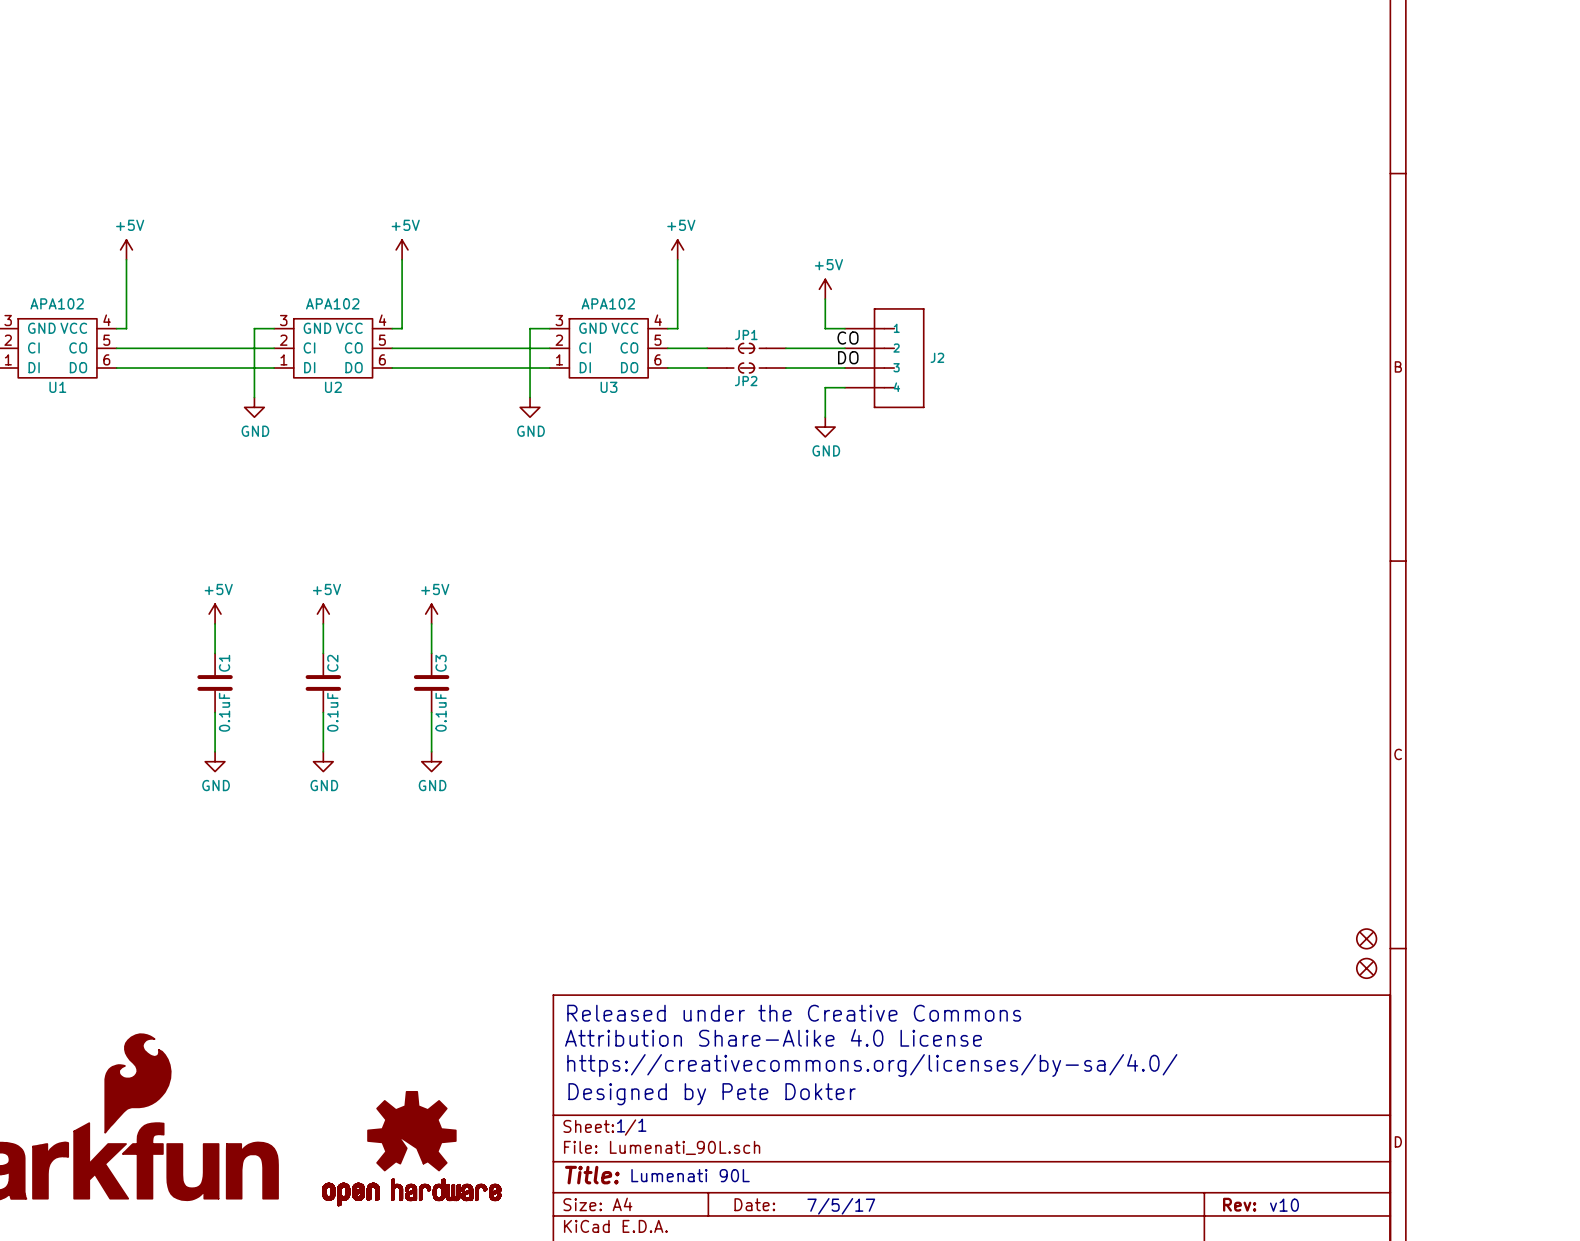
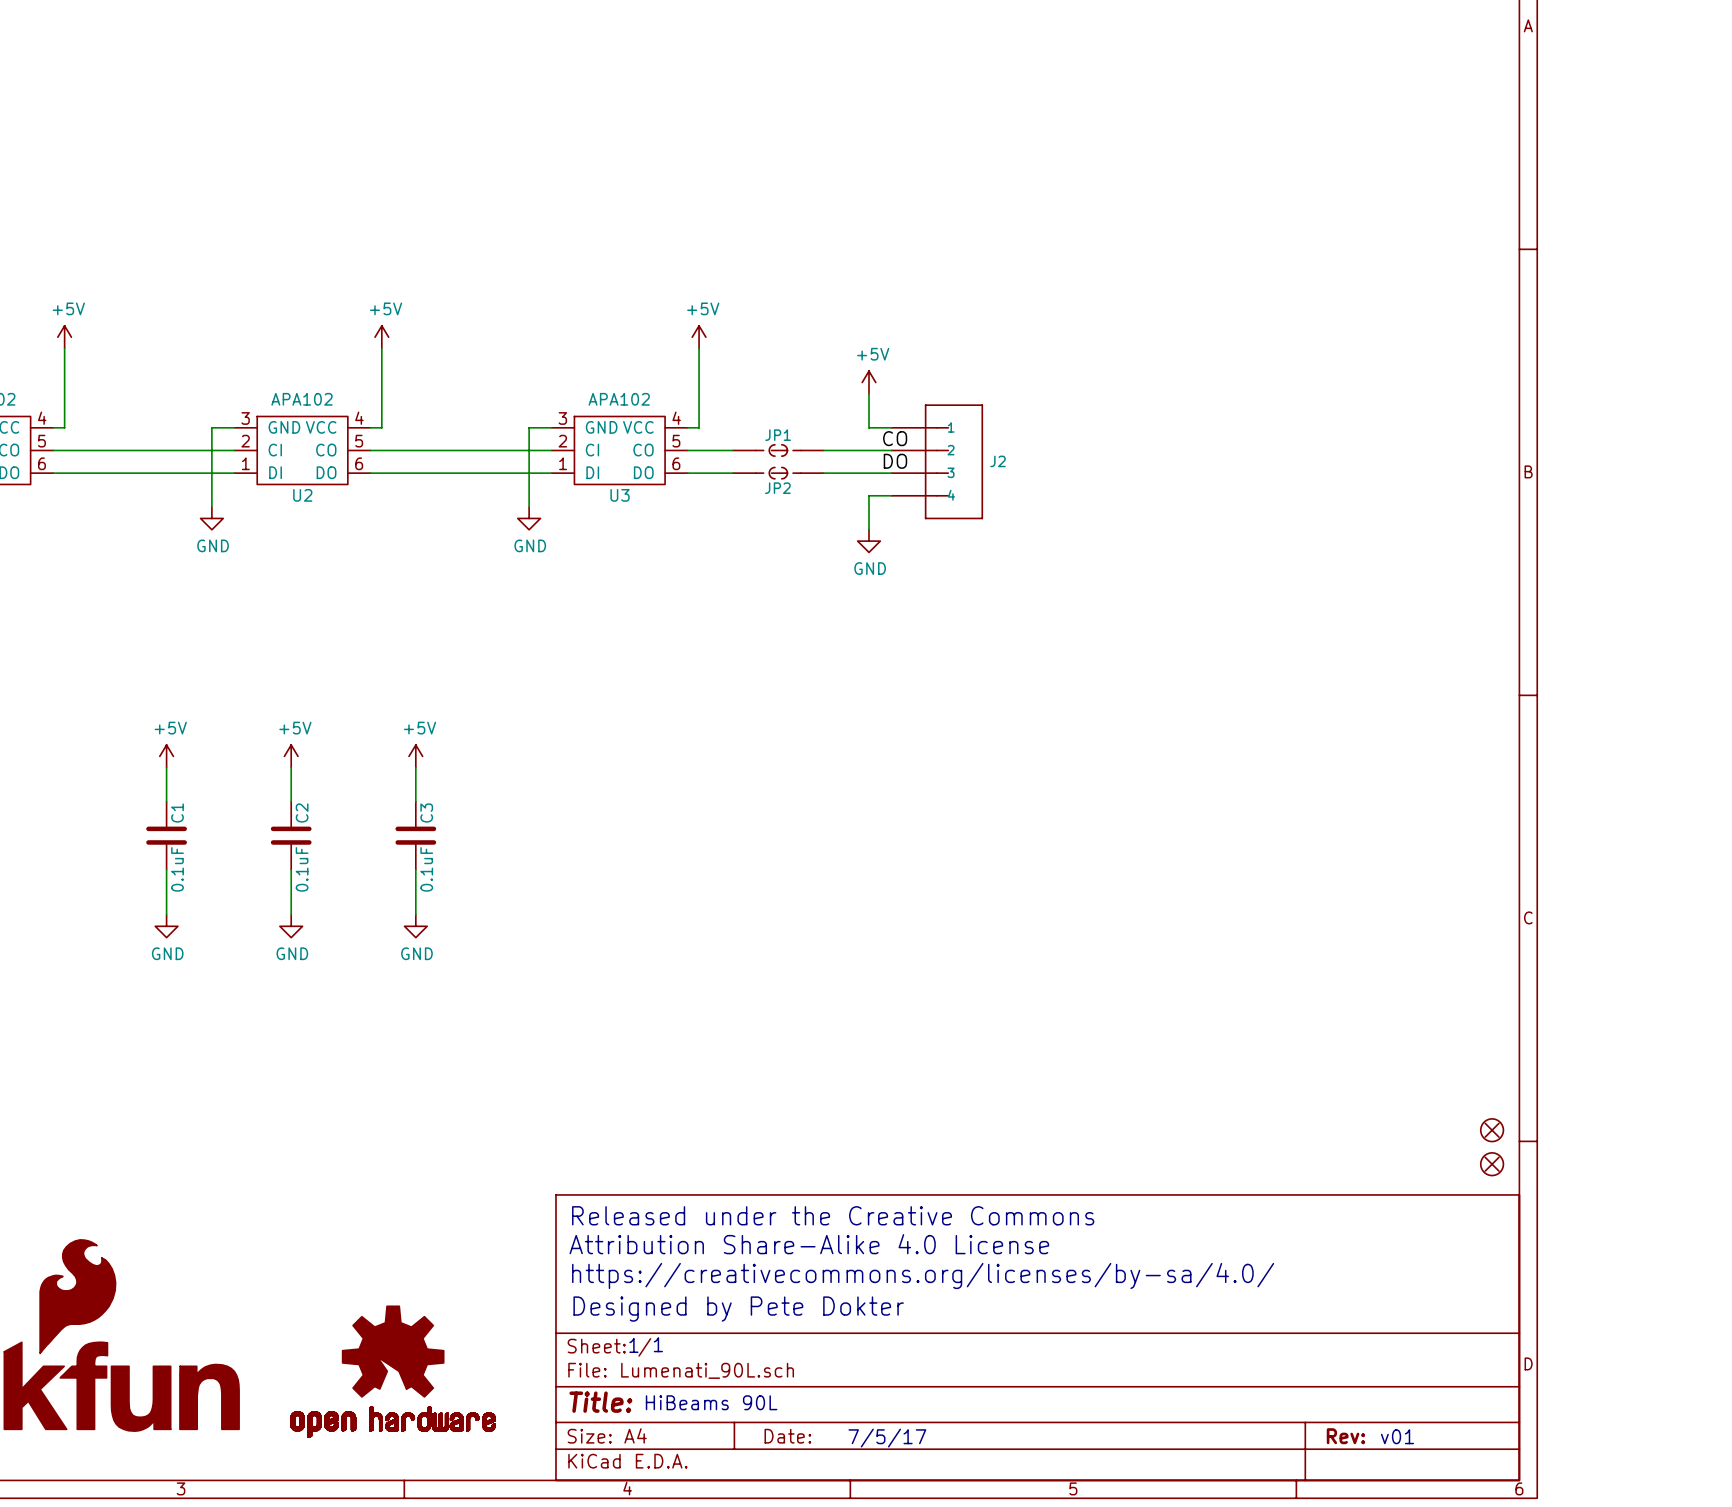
text: Lumenati 90L (690, 1175) -> HiBeams 90L (711, 1402)
text: v10 (1284, 1205) -> v01 (1397, 1436)

